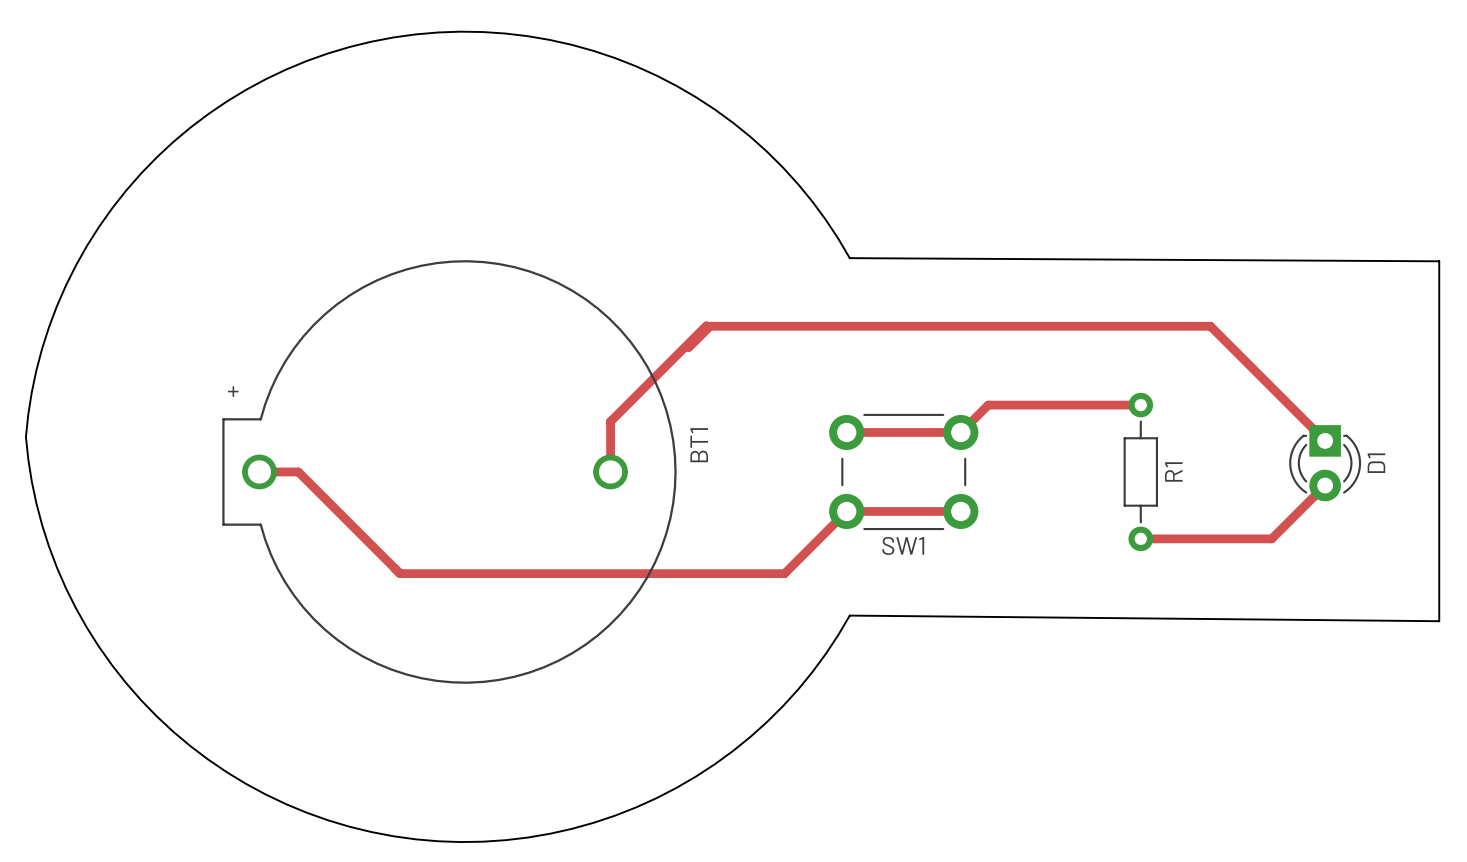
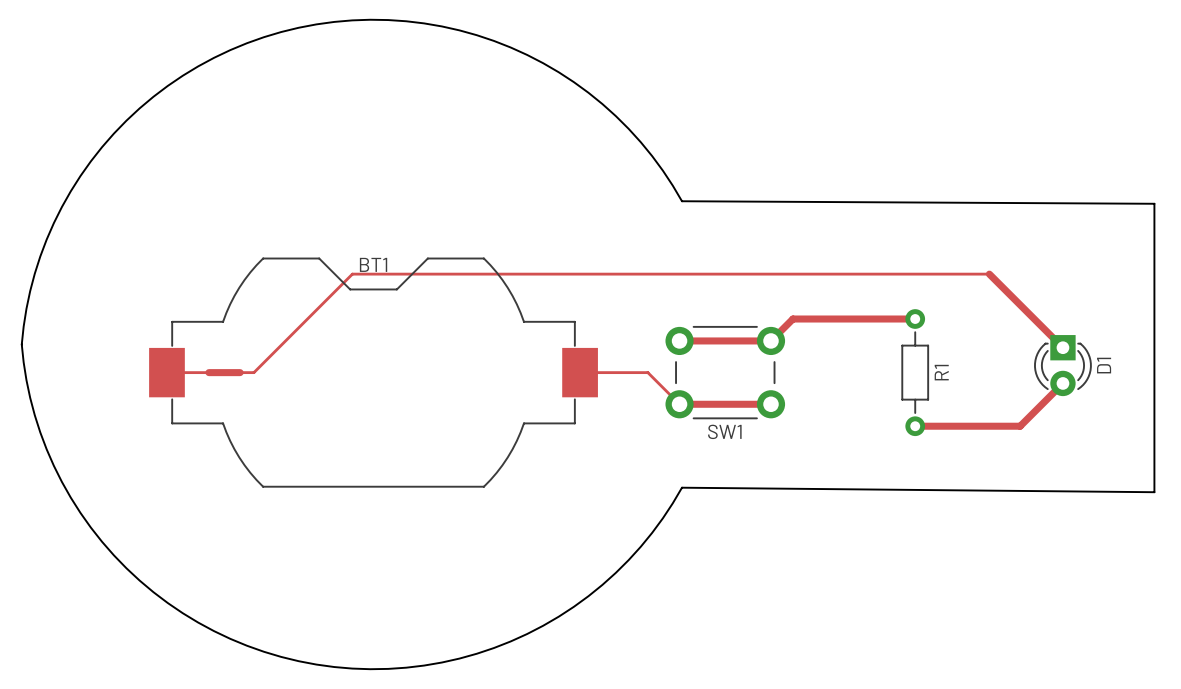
BT1 footprint: [222, 260, 677, 684] -> [149, 257, 598, 488]
track: (706, 325) (610, 421) (610, 471) -> none
track: (688, 347) (710, 326) (1210, 326) (1233, 349) -> (240, 372) (253, 372) (352, 274) (989, 274)
BT1 name position: BT1 (699, 445) -> BT1 (373, 264)
track: none -> (166, 372) (208, 372)
track: (298, 471) (400, 573) (784, 573) (846, 511) -> (580, 372) (647, 372) (679, 404)

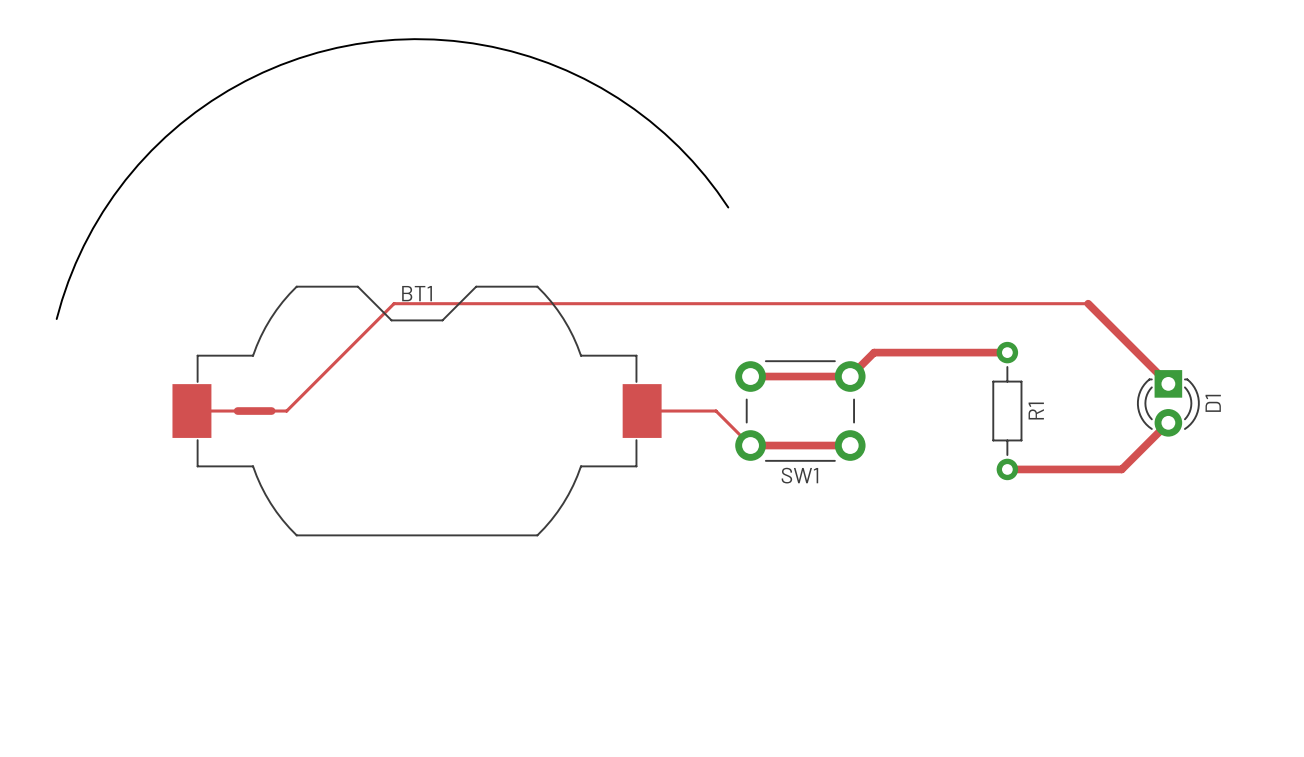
board edge: none -> (728, 207) (705, 175) (664, 133) (618, 98) (566, 70) (529, 56) (472, 43) (414, 39) (356, 44) (299, 58) (262, 72) (211, 100) (165, 137) (125, 179) (92, 228) (68, 281) (56, 319)
board edge: (681, 201) (1154, 203) (1154, 492) (681, 487) (662, 518) (628, 560) (588, 596) (543, 625) (493, 648) (441, 662) (406, 667) (352, 668) (298, 661) (246, 645) (198, 622) (167, 603) (126, 568) (90, 527) (61, 481) (40, 432) (26, 380) (21, 344) (26, 308) (34, 273) (46, 239) (61, 206) (90, 161) (113, 133) (139, 108) (182, 75) (213, 57) (246, 43) (298, 27) (334, 21) (370, 19) (424, 23) (459, 30) (493, 40) (543, 63) (573, 82) (602, 104) (628, 128) (652, 156) (681, 201) -> none

